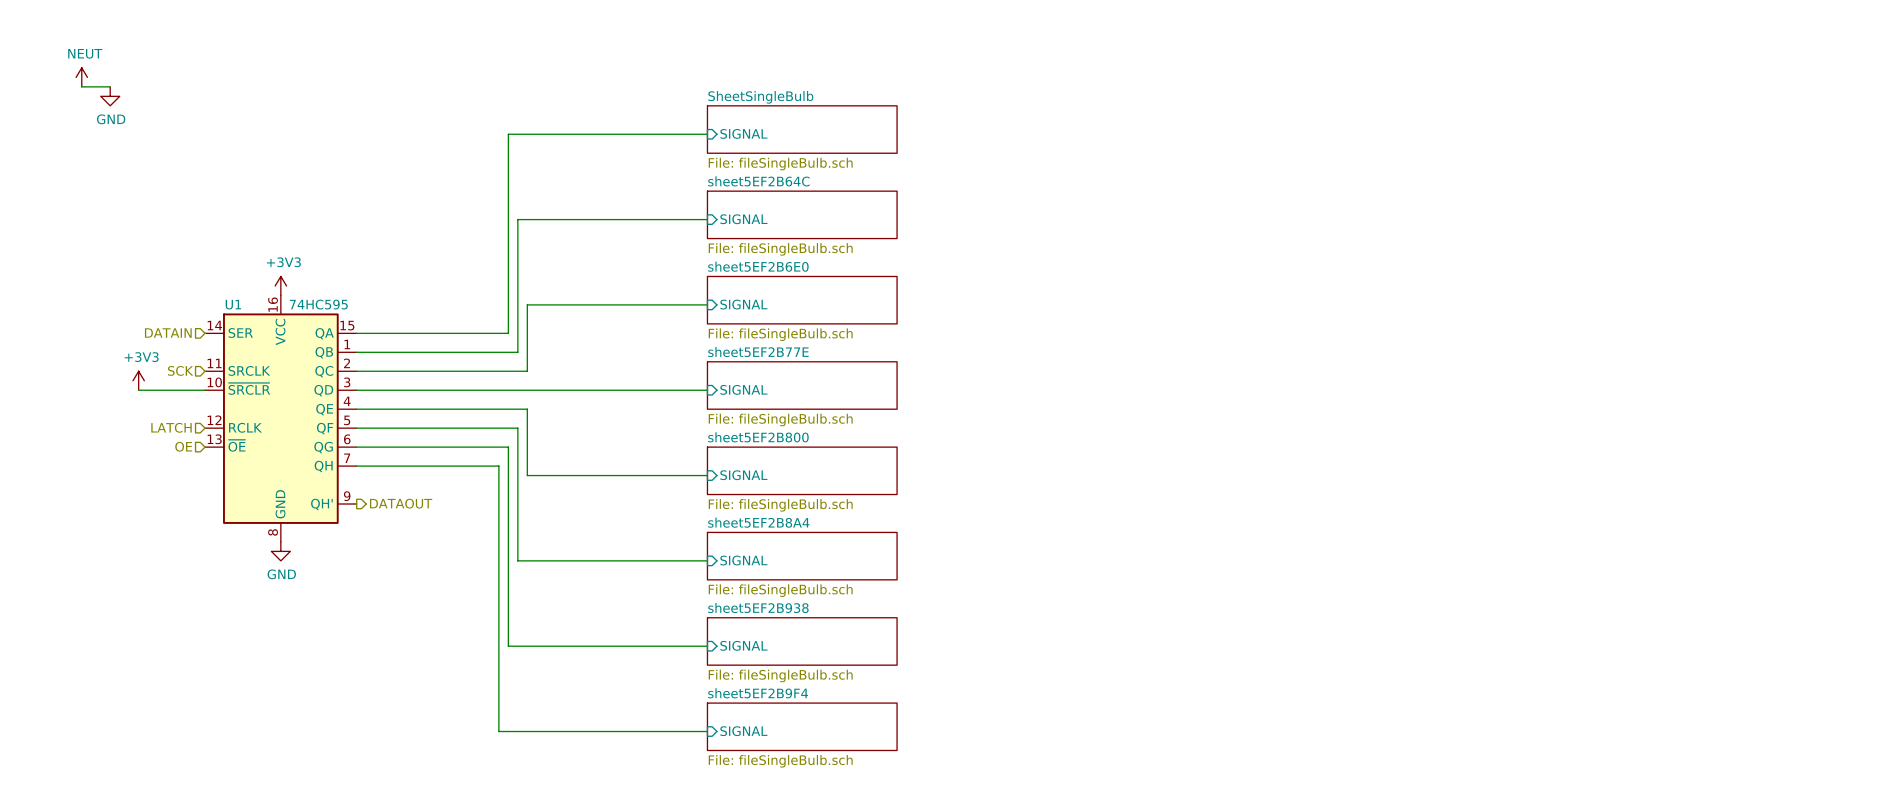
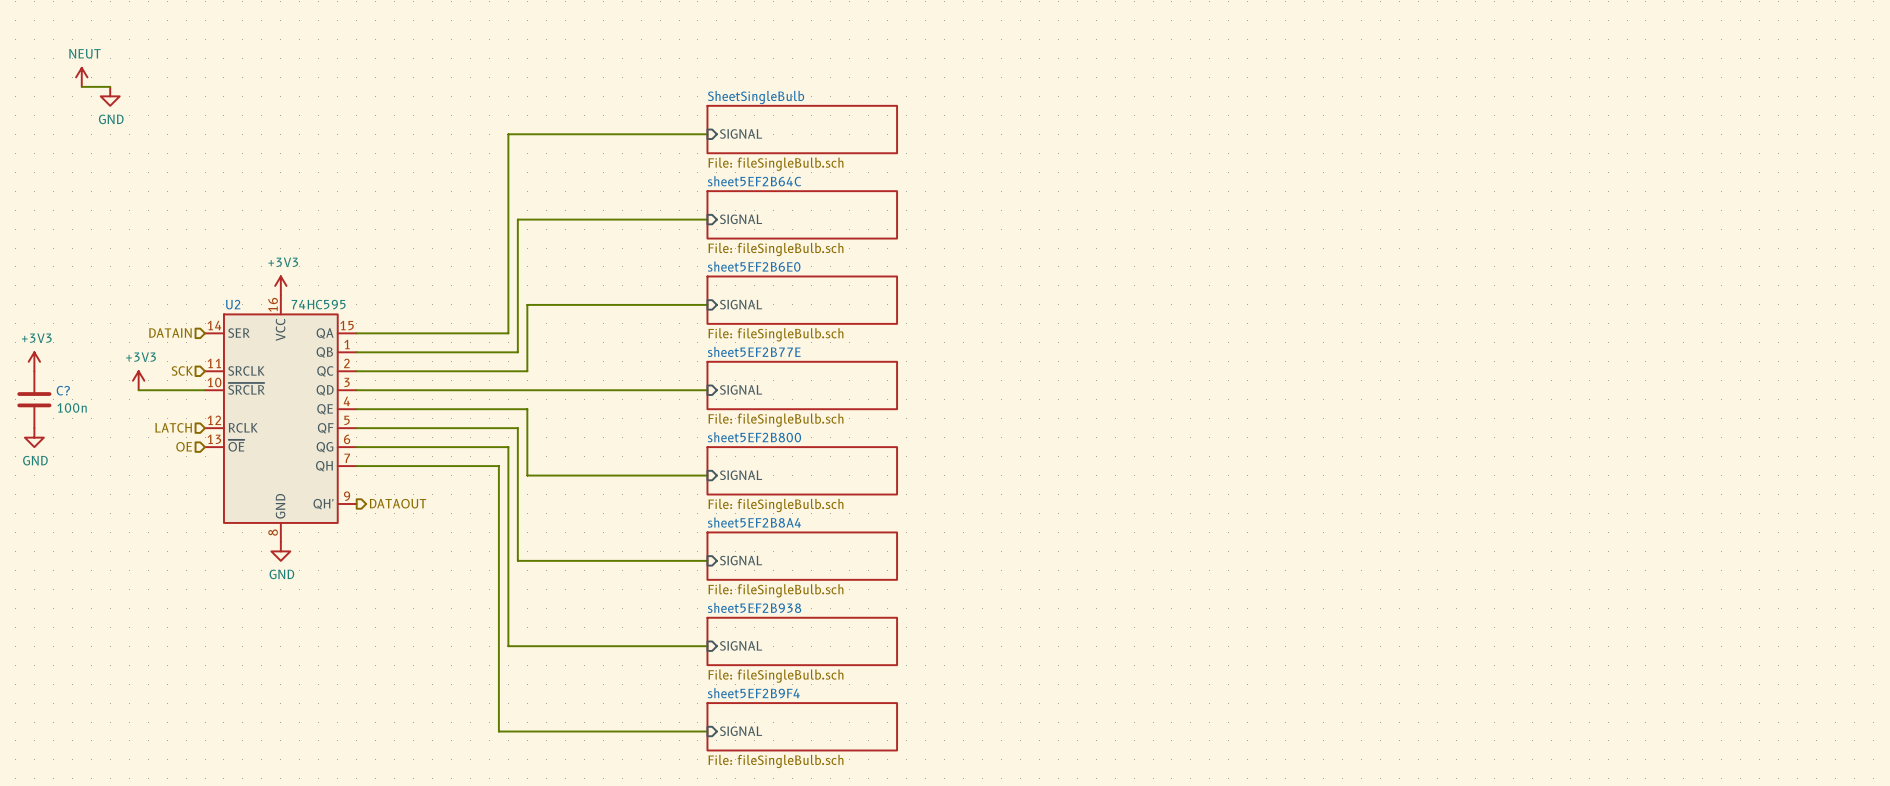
U1 name: U1 (233, 304) -> U2 (233, 304)
power symbol: none -> +3V3 (34, 361)
C?: none -> 100n (34, 399)
power symbol: none -> GND (34, 437)

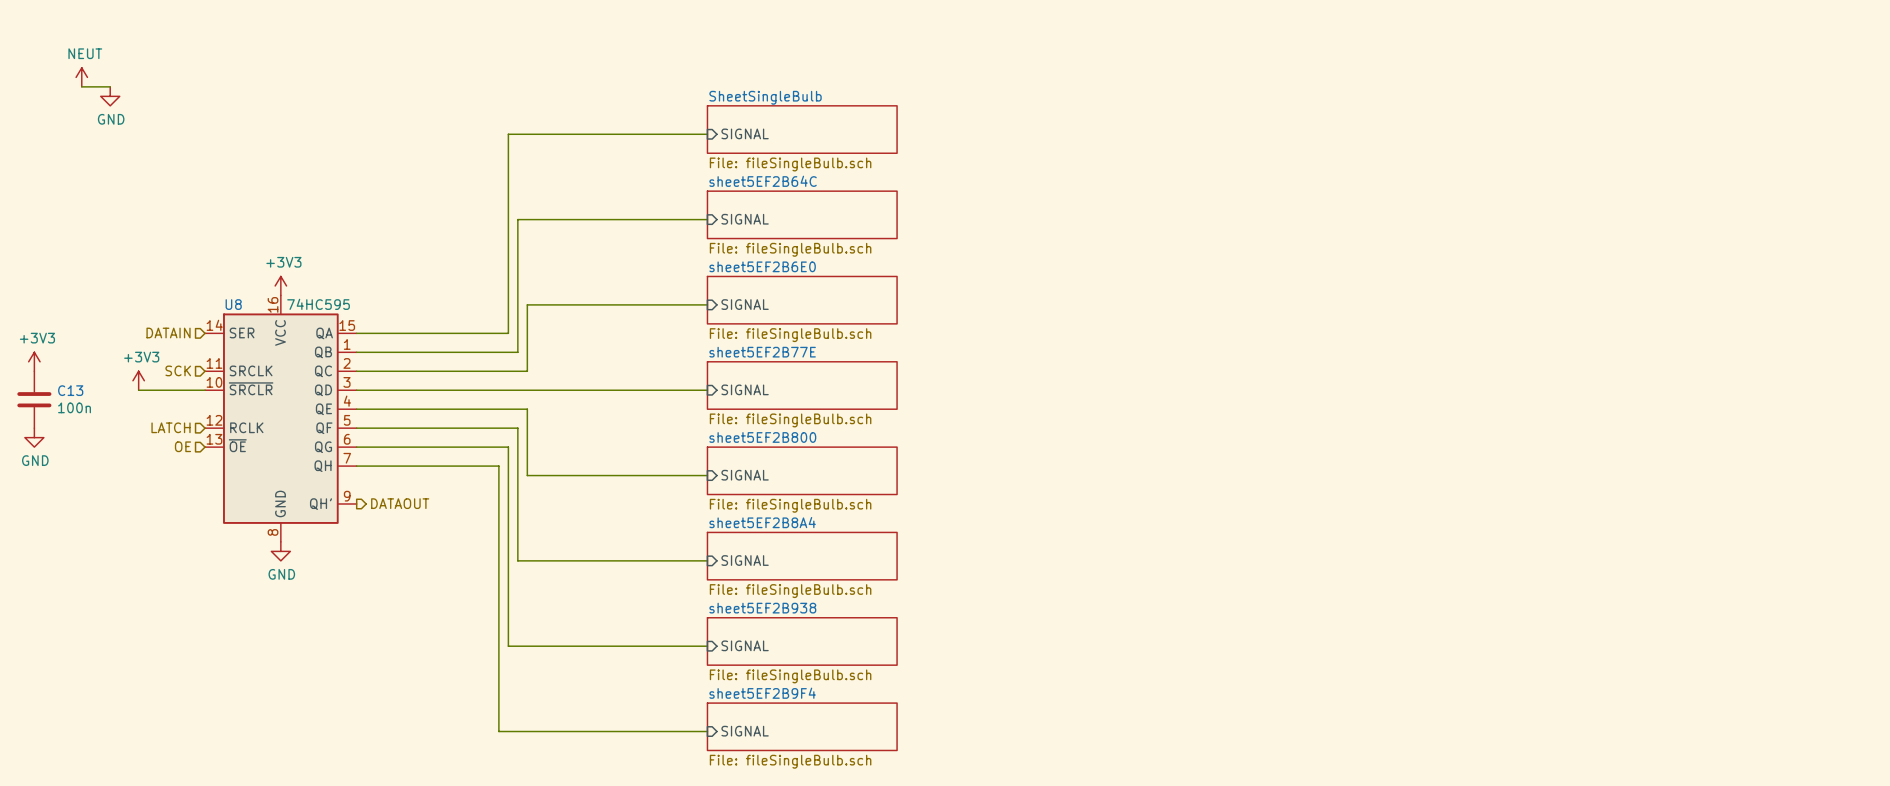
U2 name: U2 (233, 304) -> U8 (233, 304)
C? name: C? (63, 390) -> C13 (70, 390)

